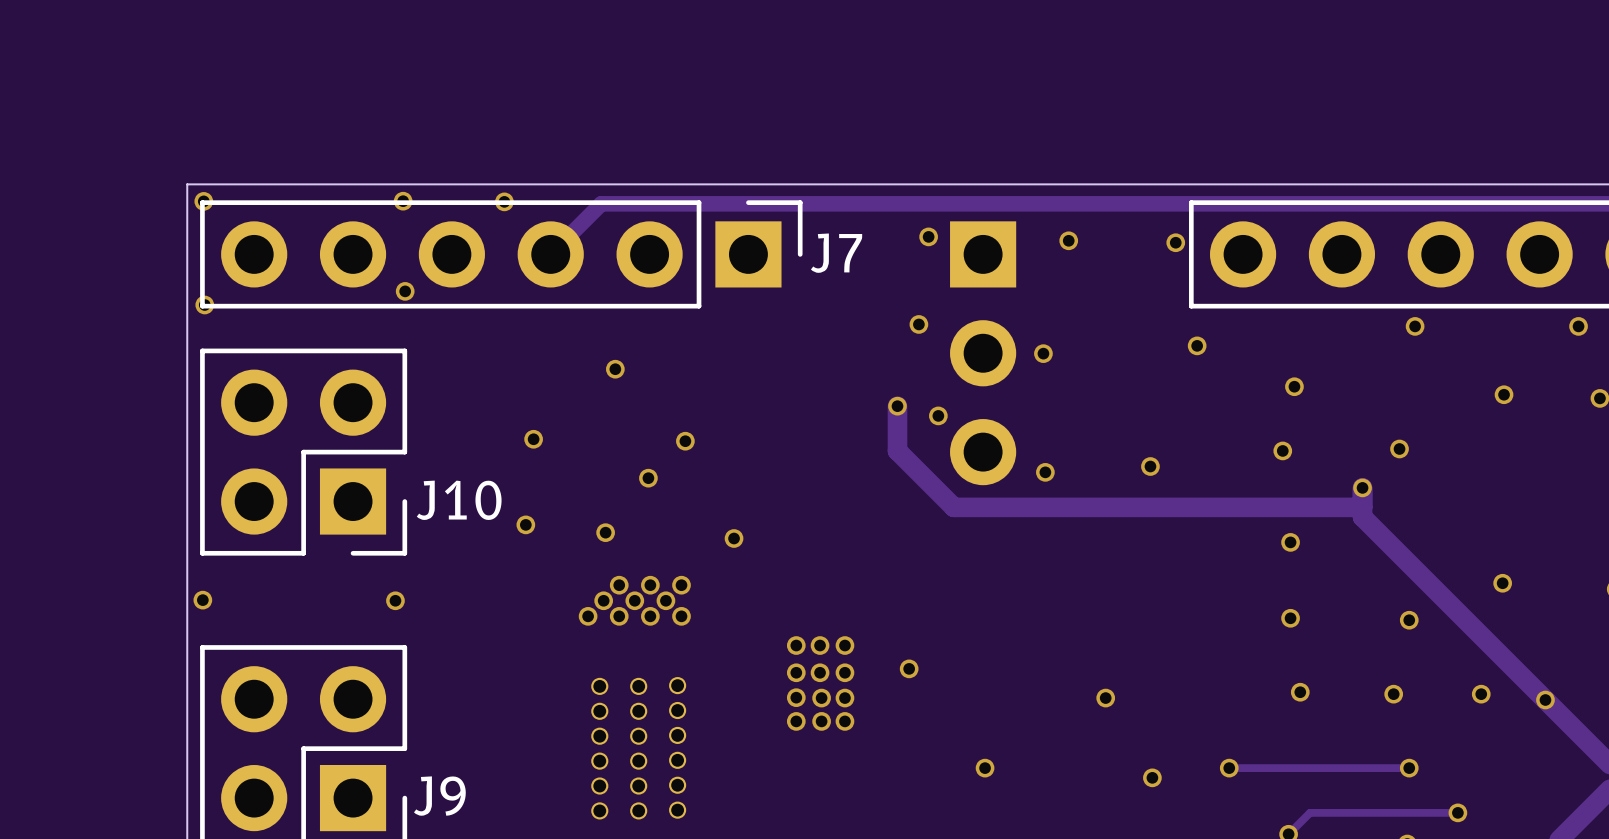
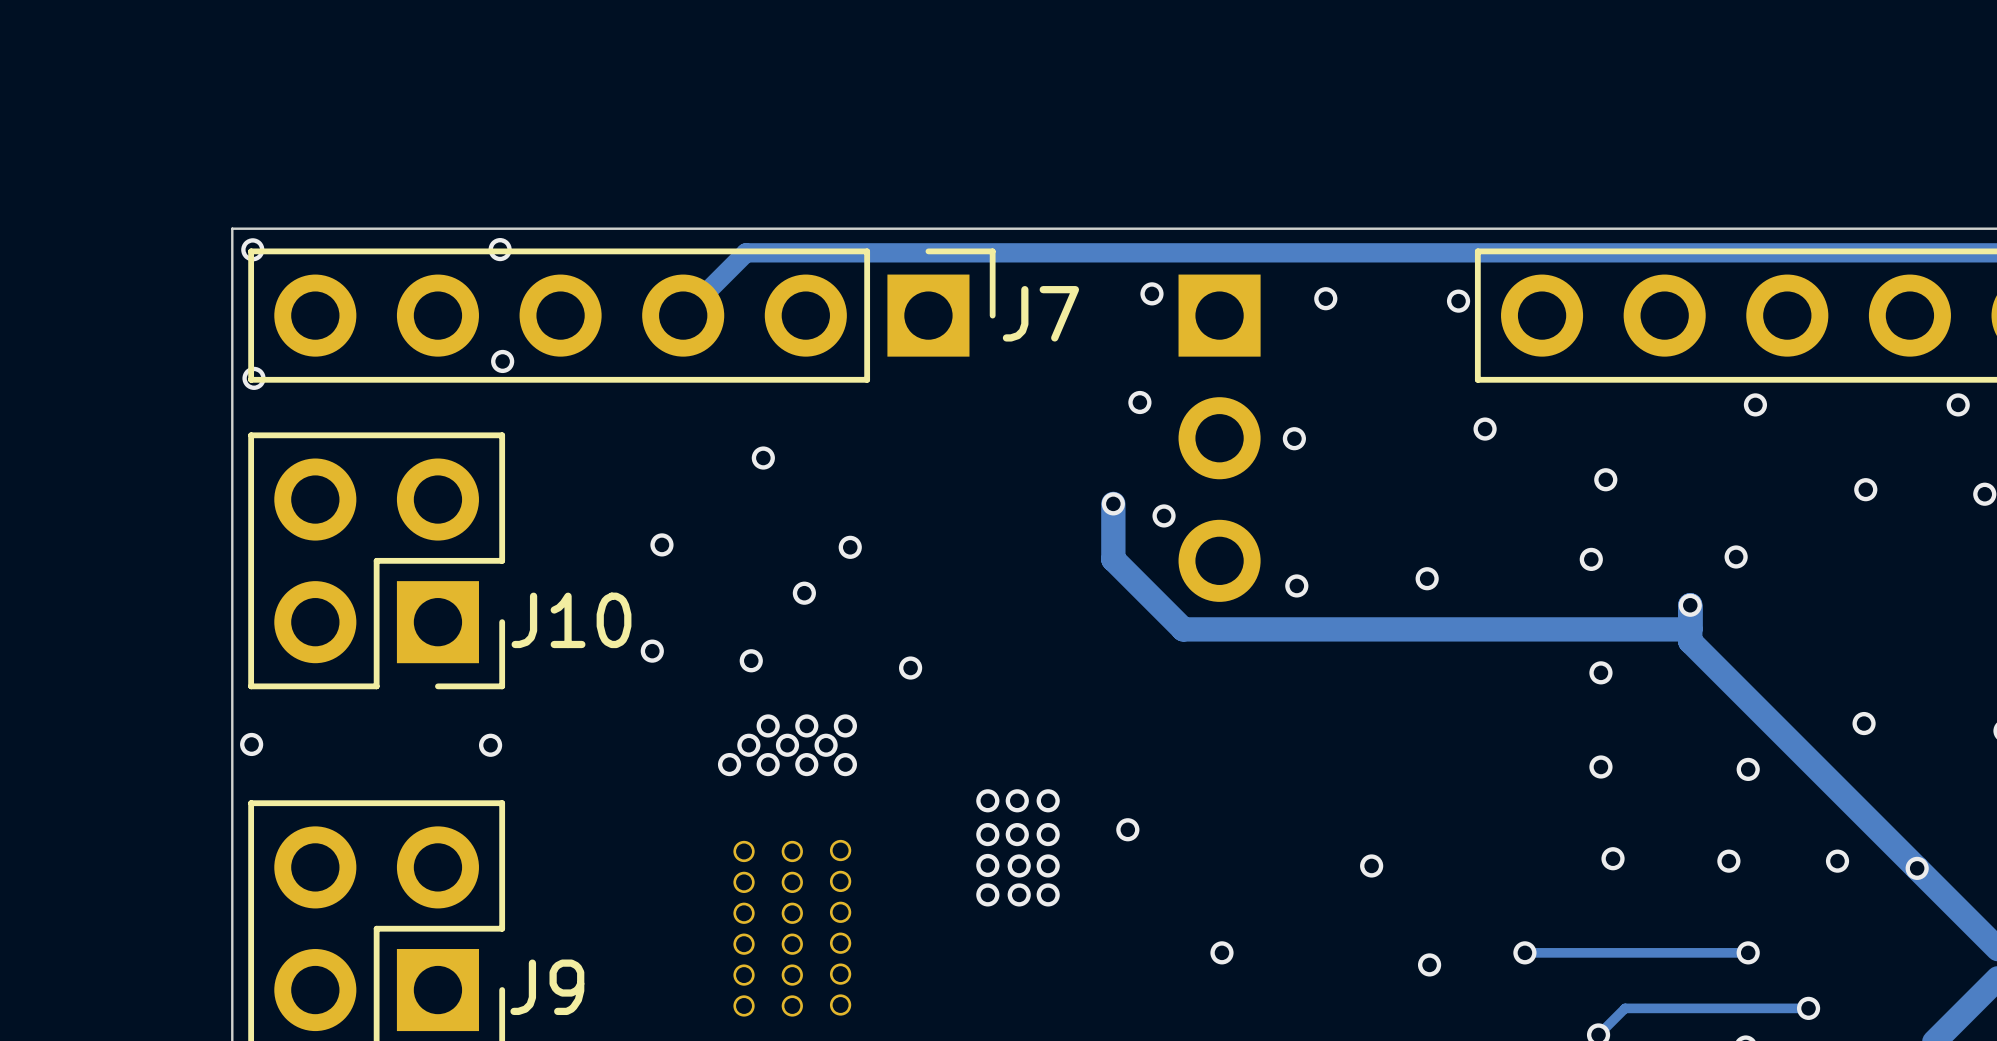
via: (504, 201) -> none

